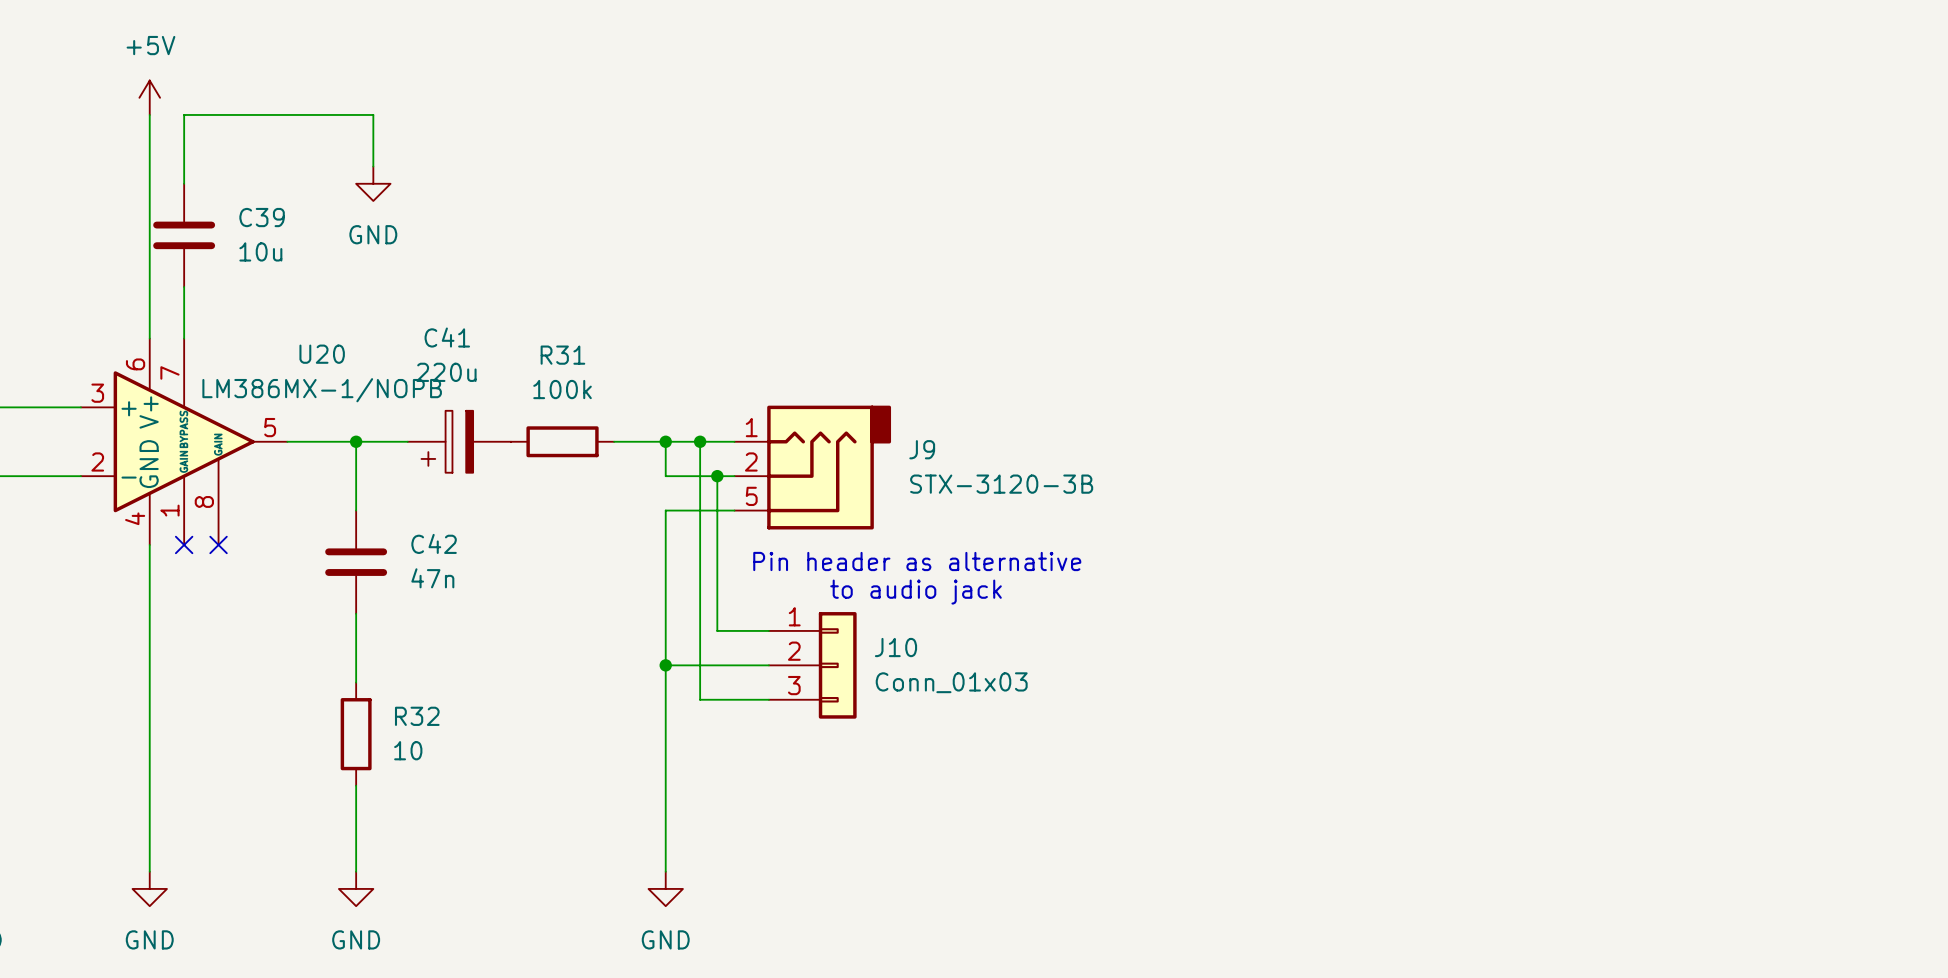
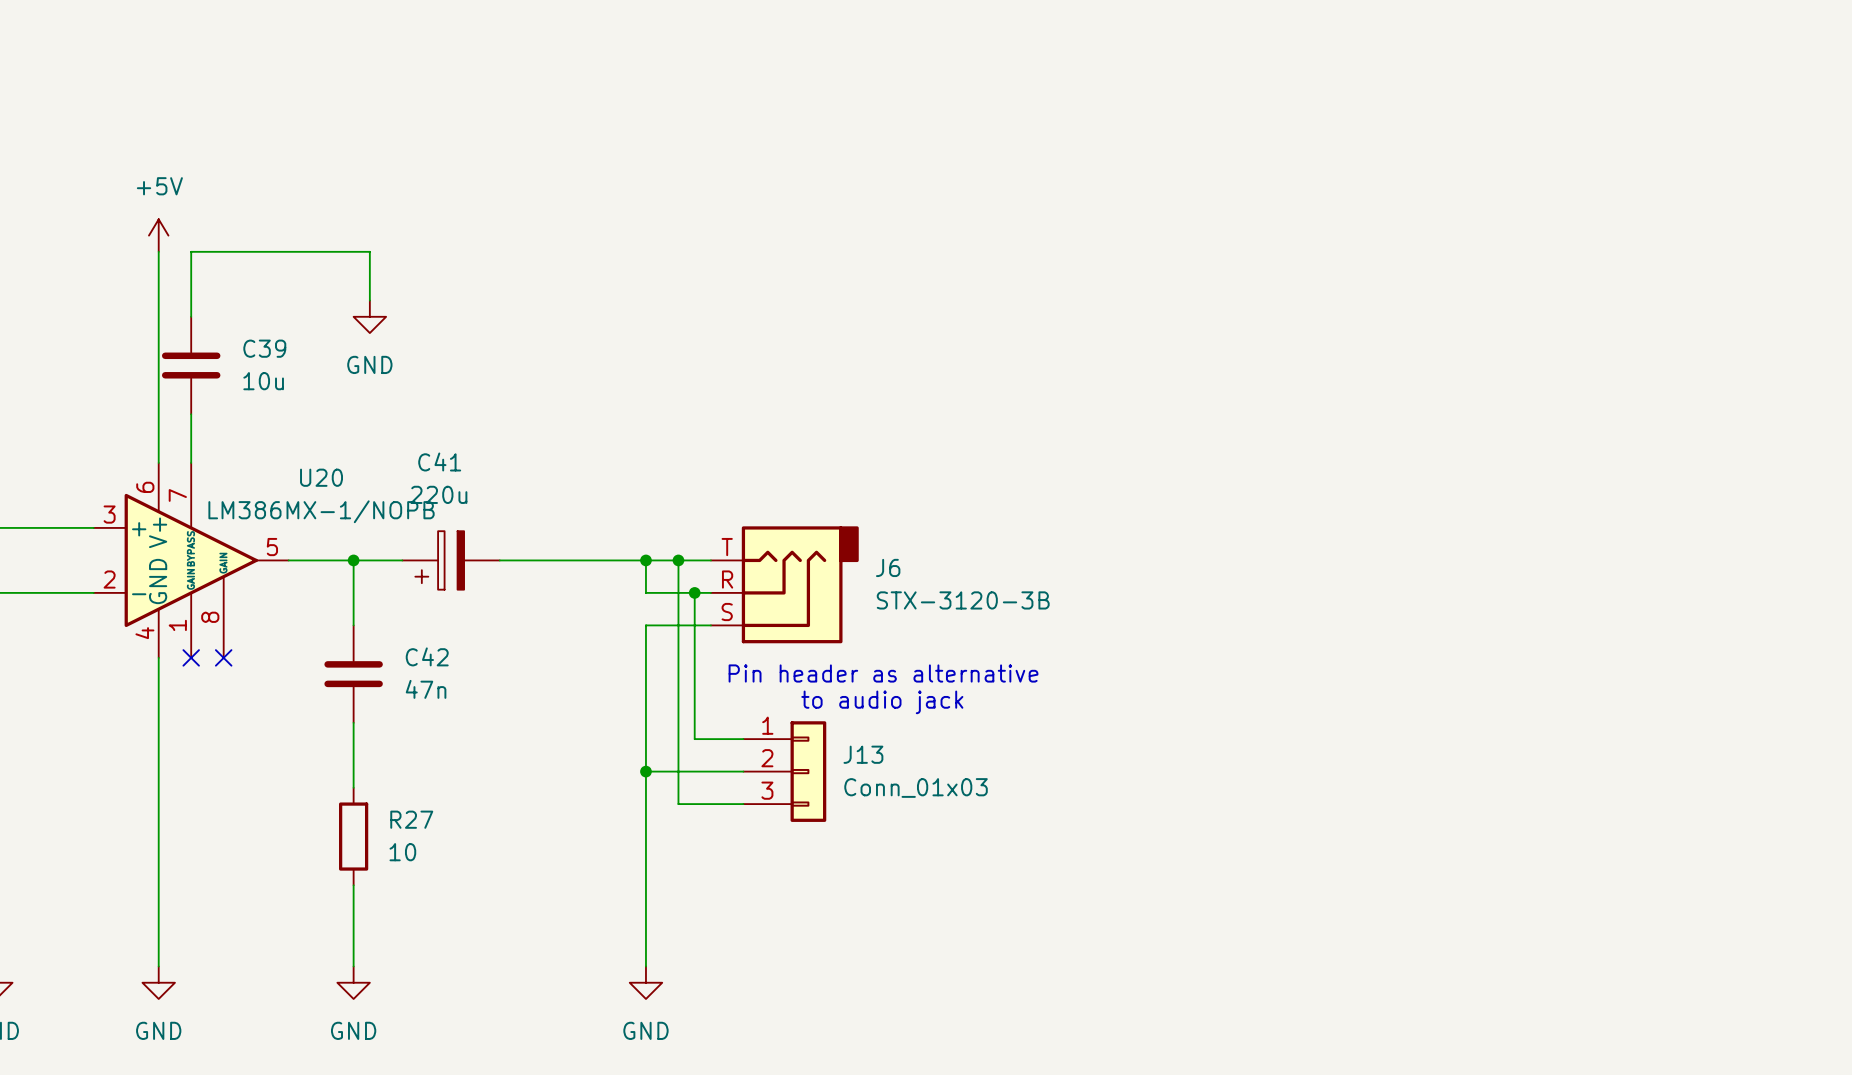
J9 pin number: 1 (751, 427) -> T (727, 547)
wire: none -> (499, 560) (597, 560)
R31: 100k (562, 441) -> none
J9 name: J9 (922, 449) -> J6 (888, 567)
J9 pin number: 2 (751, 461) -> R (727, 579)
J9 pin number: 5 (751, 496) -> S (727, 612)
J10 name: J10 (896, 647) -> J13 (863, 754)
R32 name: R32 (417, 716) -> R27 (411, 819)

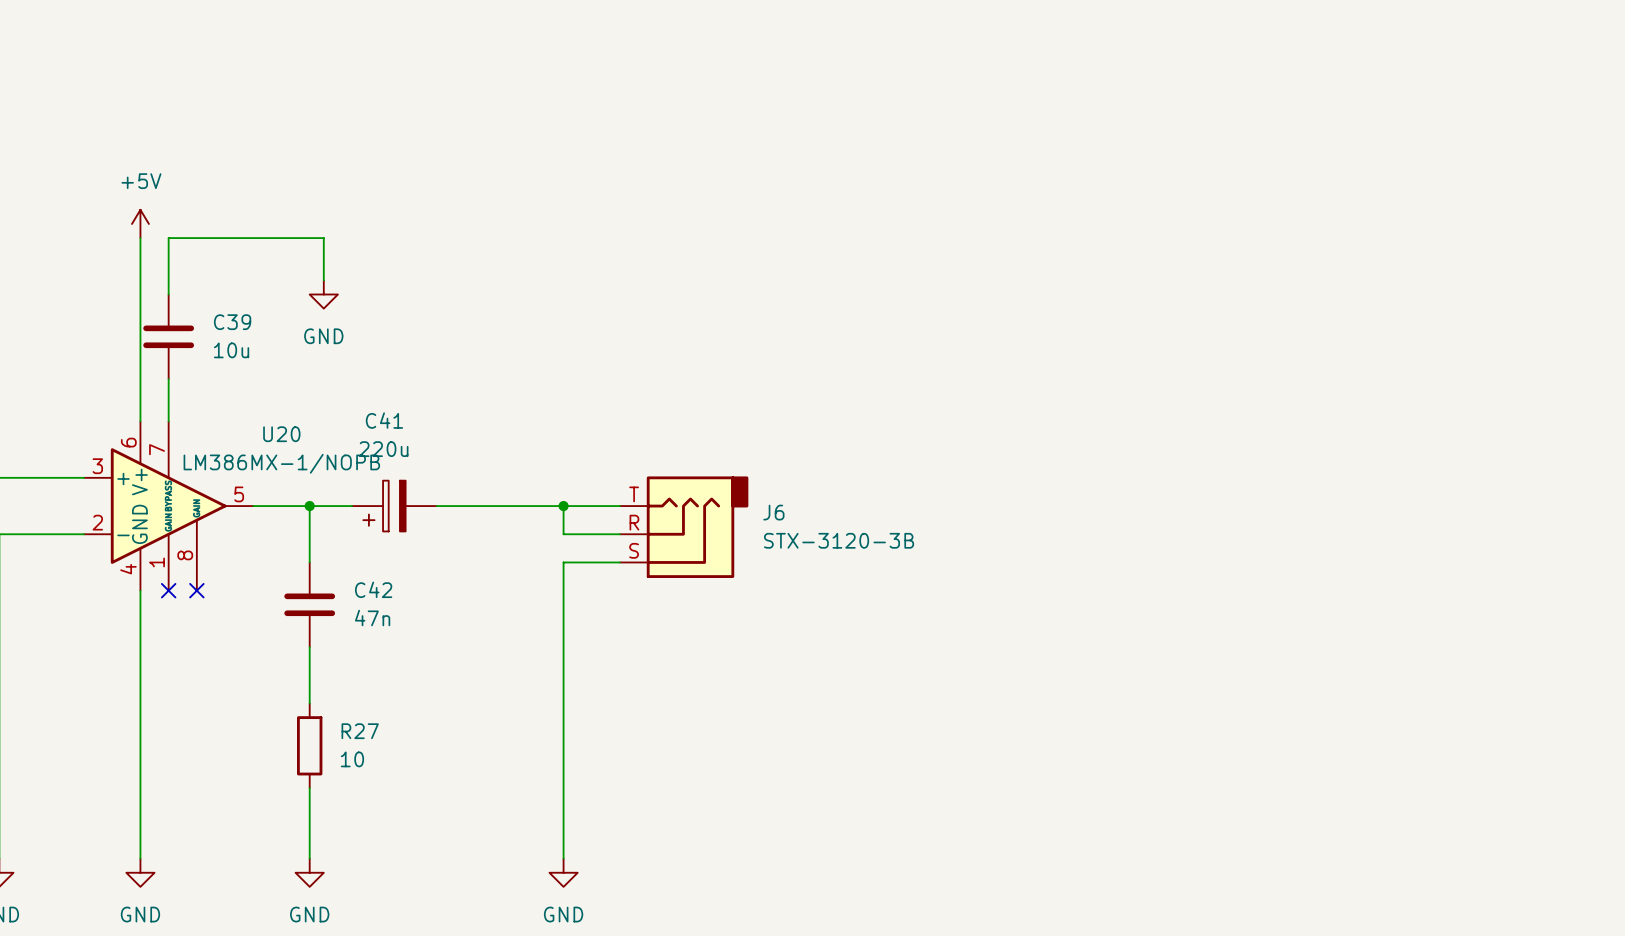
wire: (678, 560) (678, 804) (743, 804) -> none
junction: (678, 560) -> none
wire: (694, 592) (694, 739) (743, 739) -> none
junction: (694, 592) -> none
text: Pin header as alternative (883, 673) -> none
text: to audio jack (882, 702) -> none
wire: (645, 771) (743, 771) -> none
junction: (645, 771) -> none
J13: Conn_01x03 (784, 771) -> none

